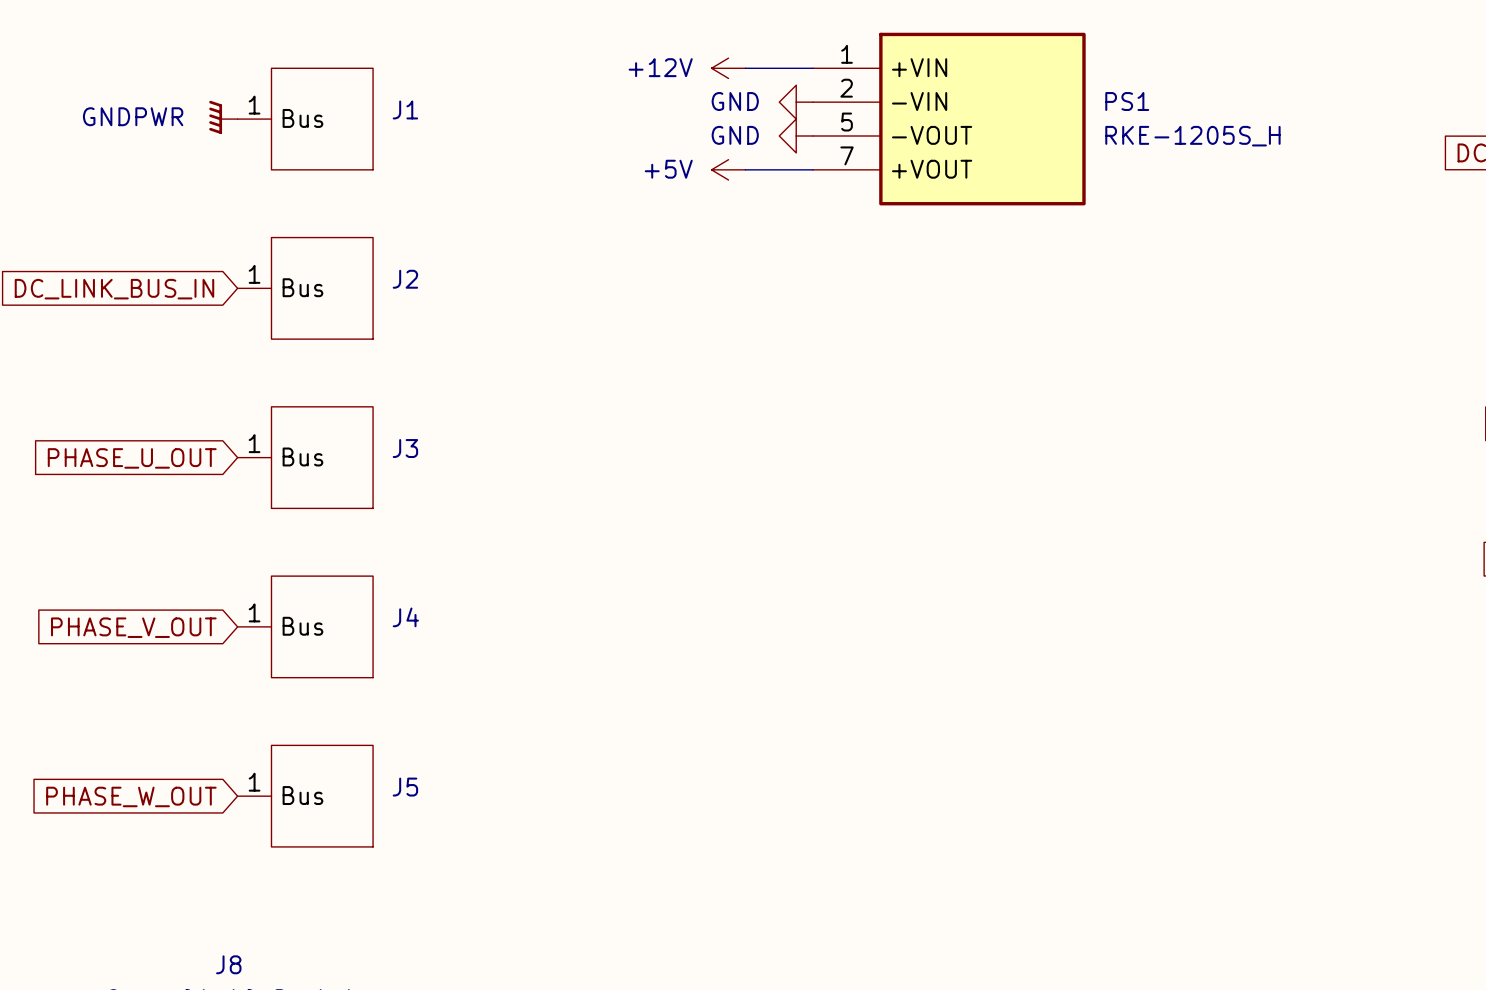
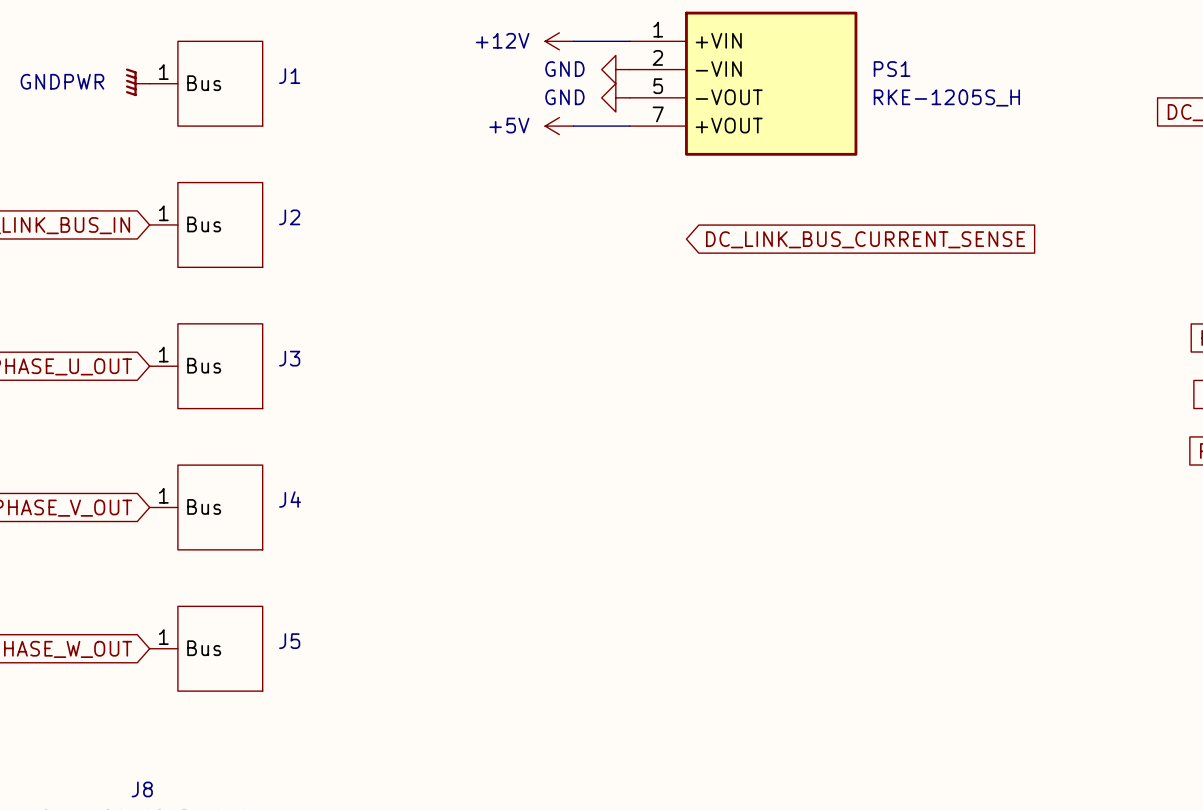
global label: none -> DC_LINK_BUS_CURRENT_SENSE (865, 239)

